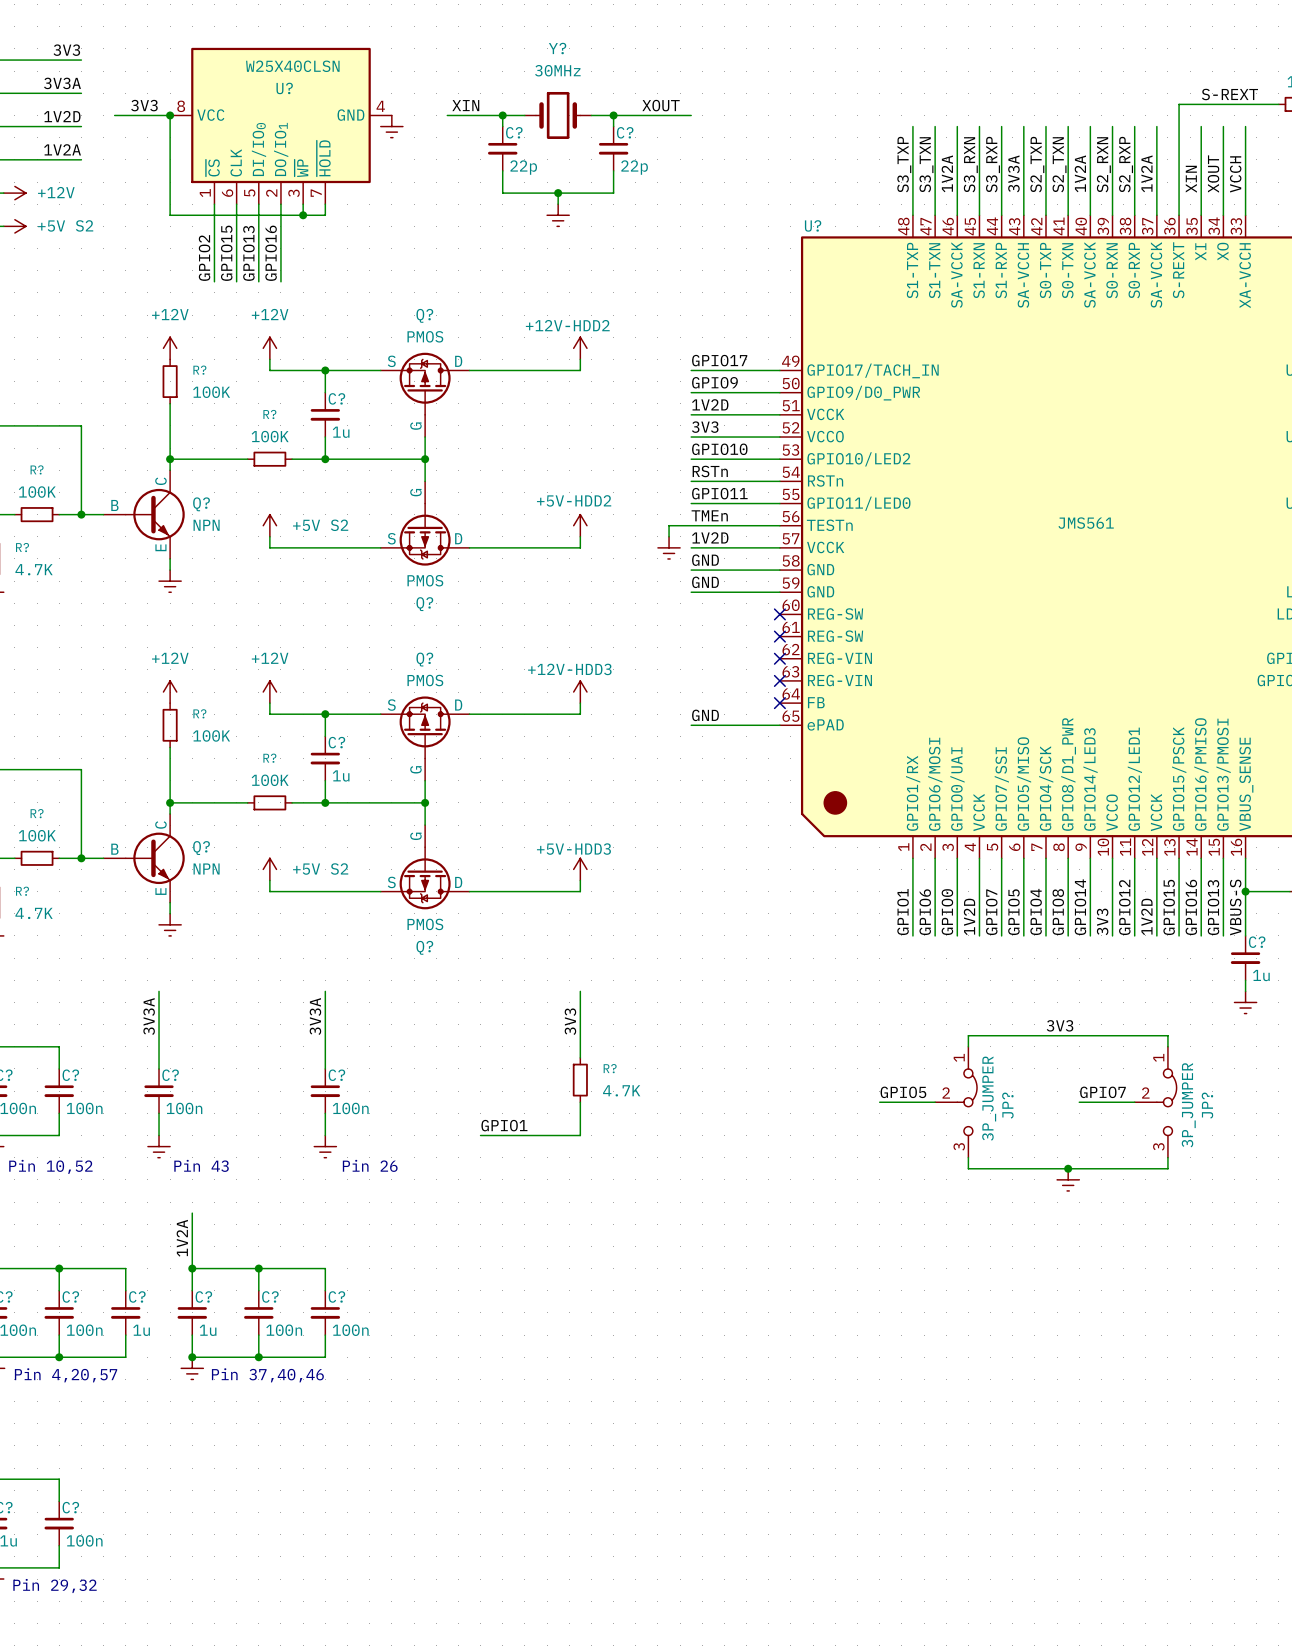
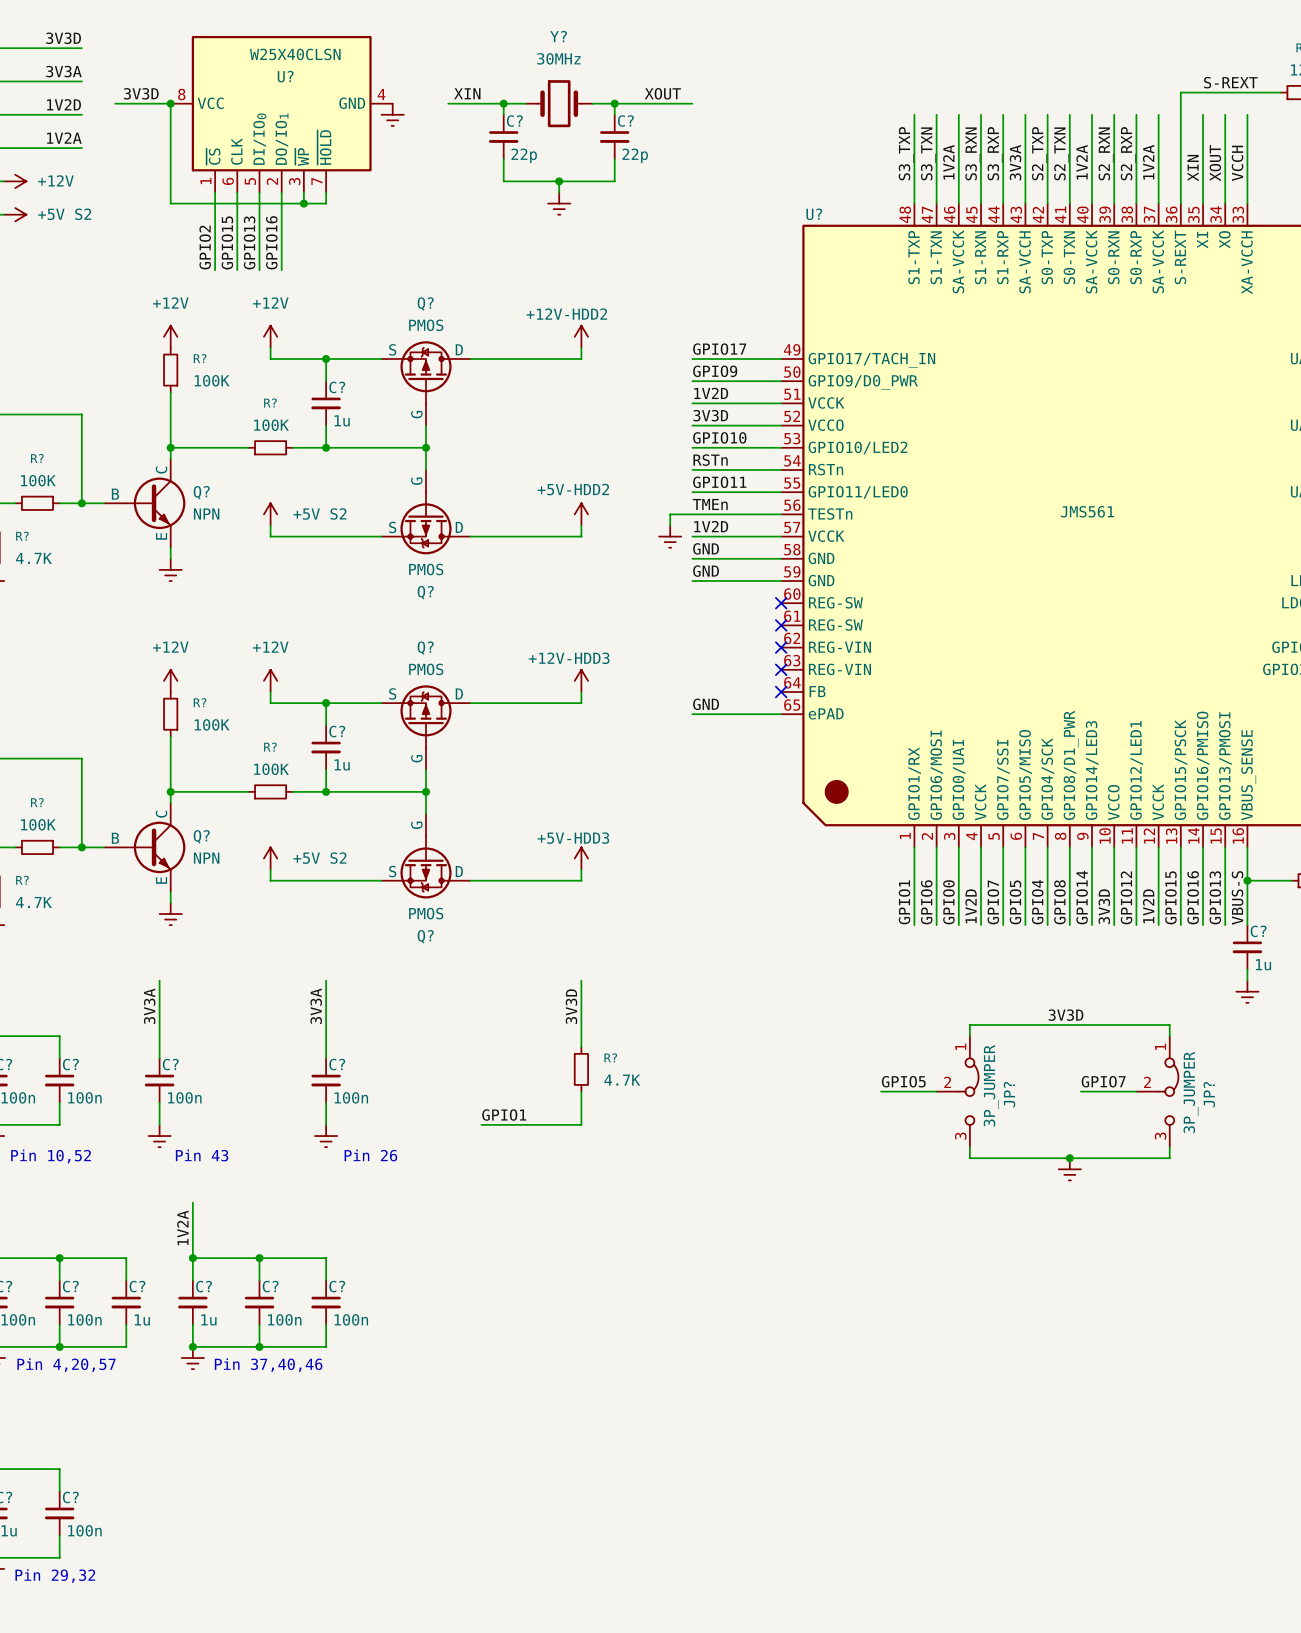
label: 3V3 (66, 50) -> 3V3D (63, 38)
label: 3V3 (144, 105) -> 3V3D (141, 93)
label: 3V3 (705, 427) -> 3V3D (710, 415)
label: 3V3 (1102, 921) -> 3V3D (1104, 906)
label: 3V3 (570, 1021) -> 3V3D (571, 1006)
label: 3V3 (1060, 1025) -> 3V3D (1065, 1015)

